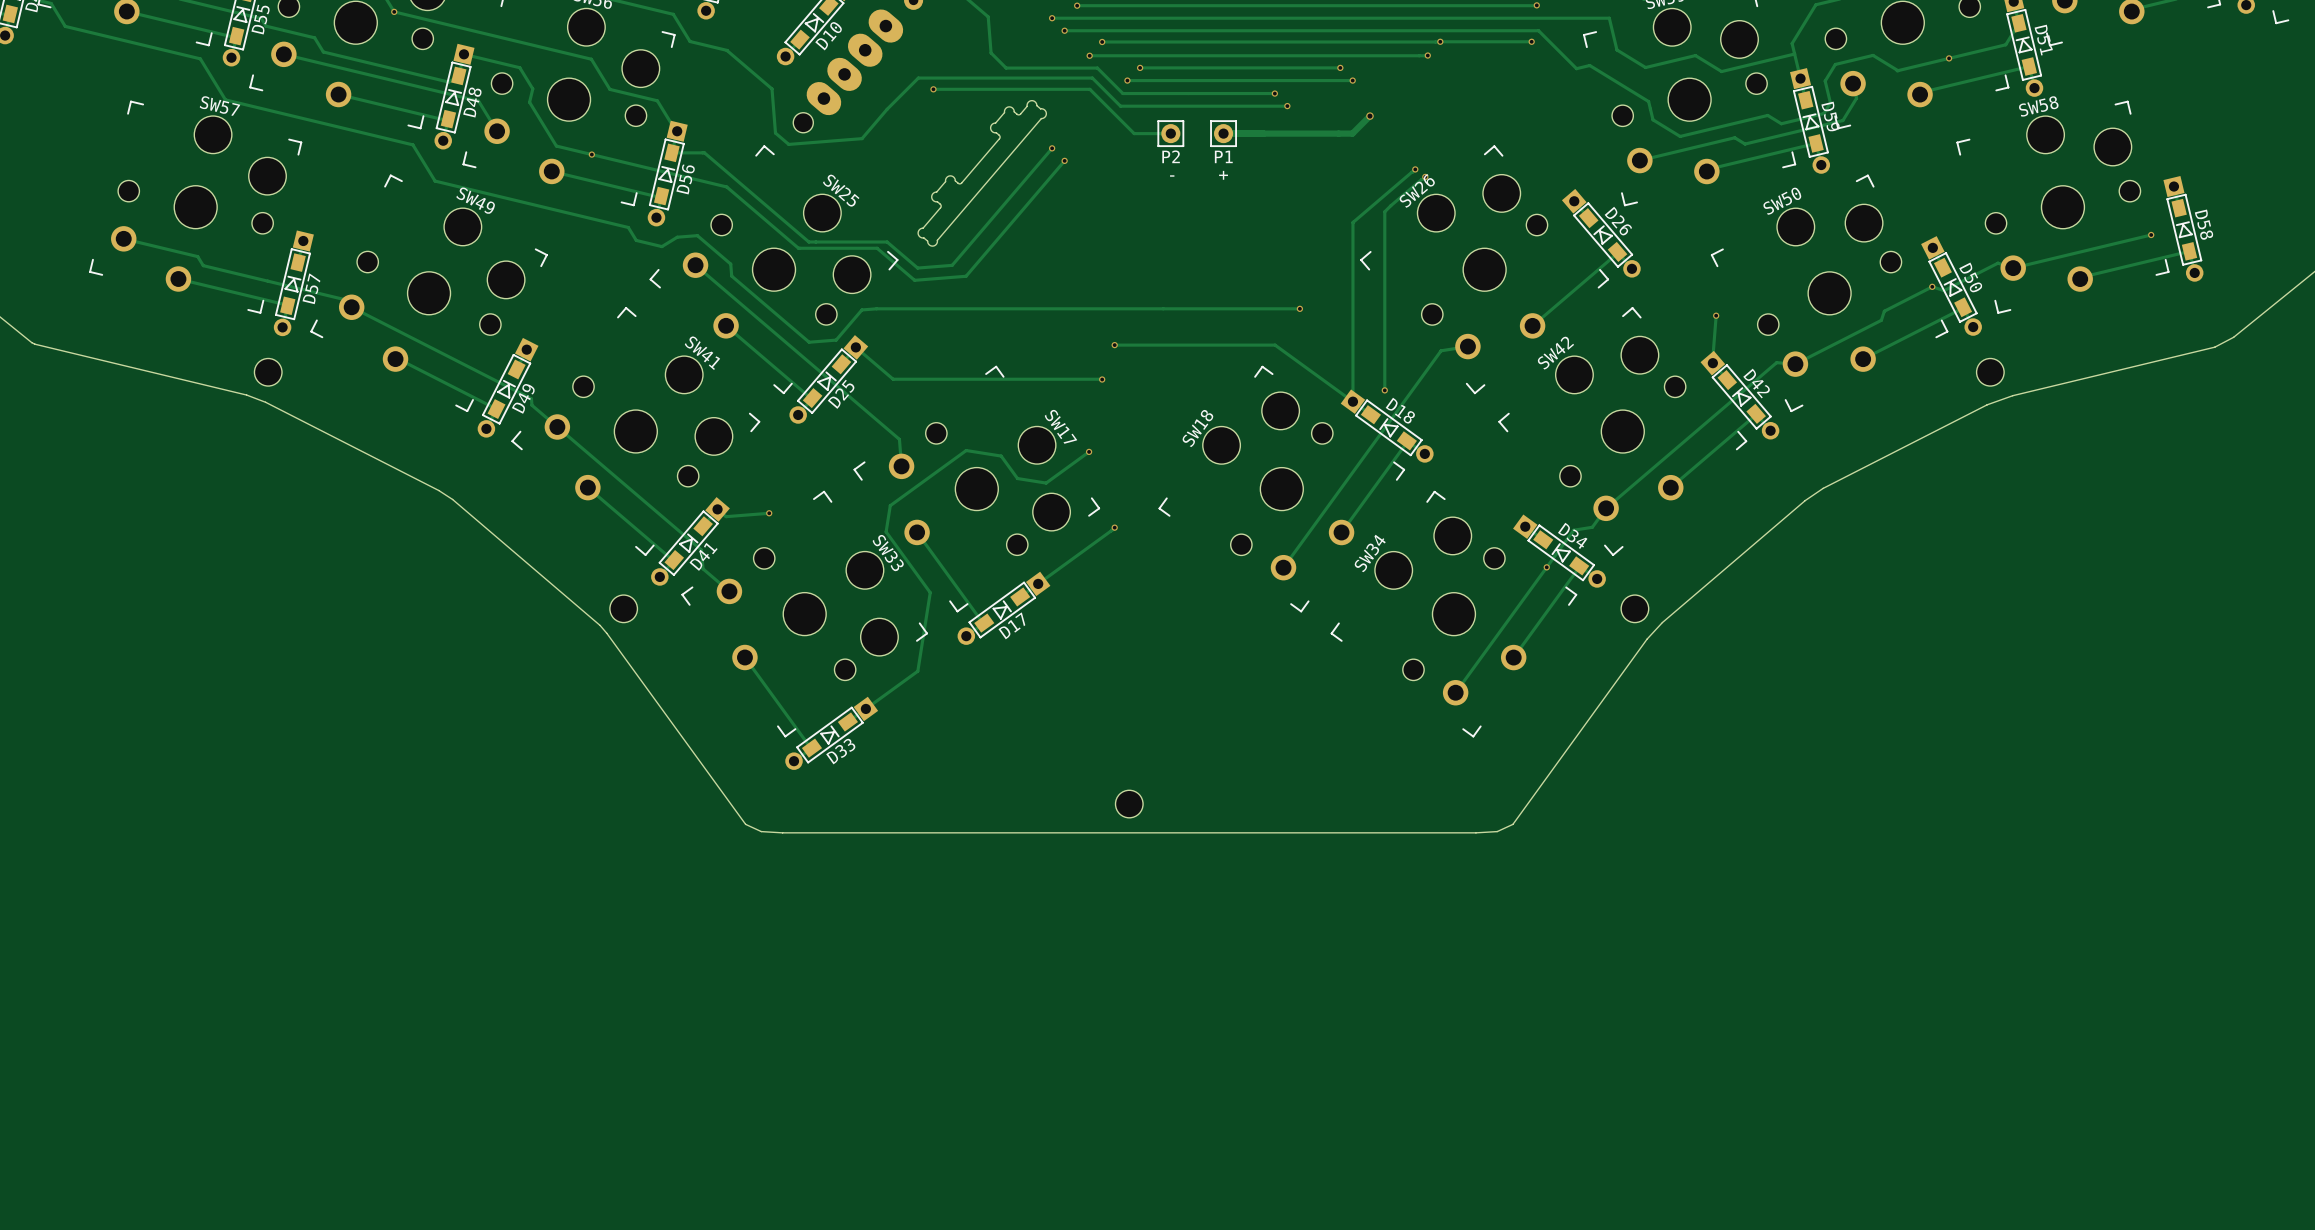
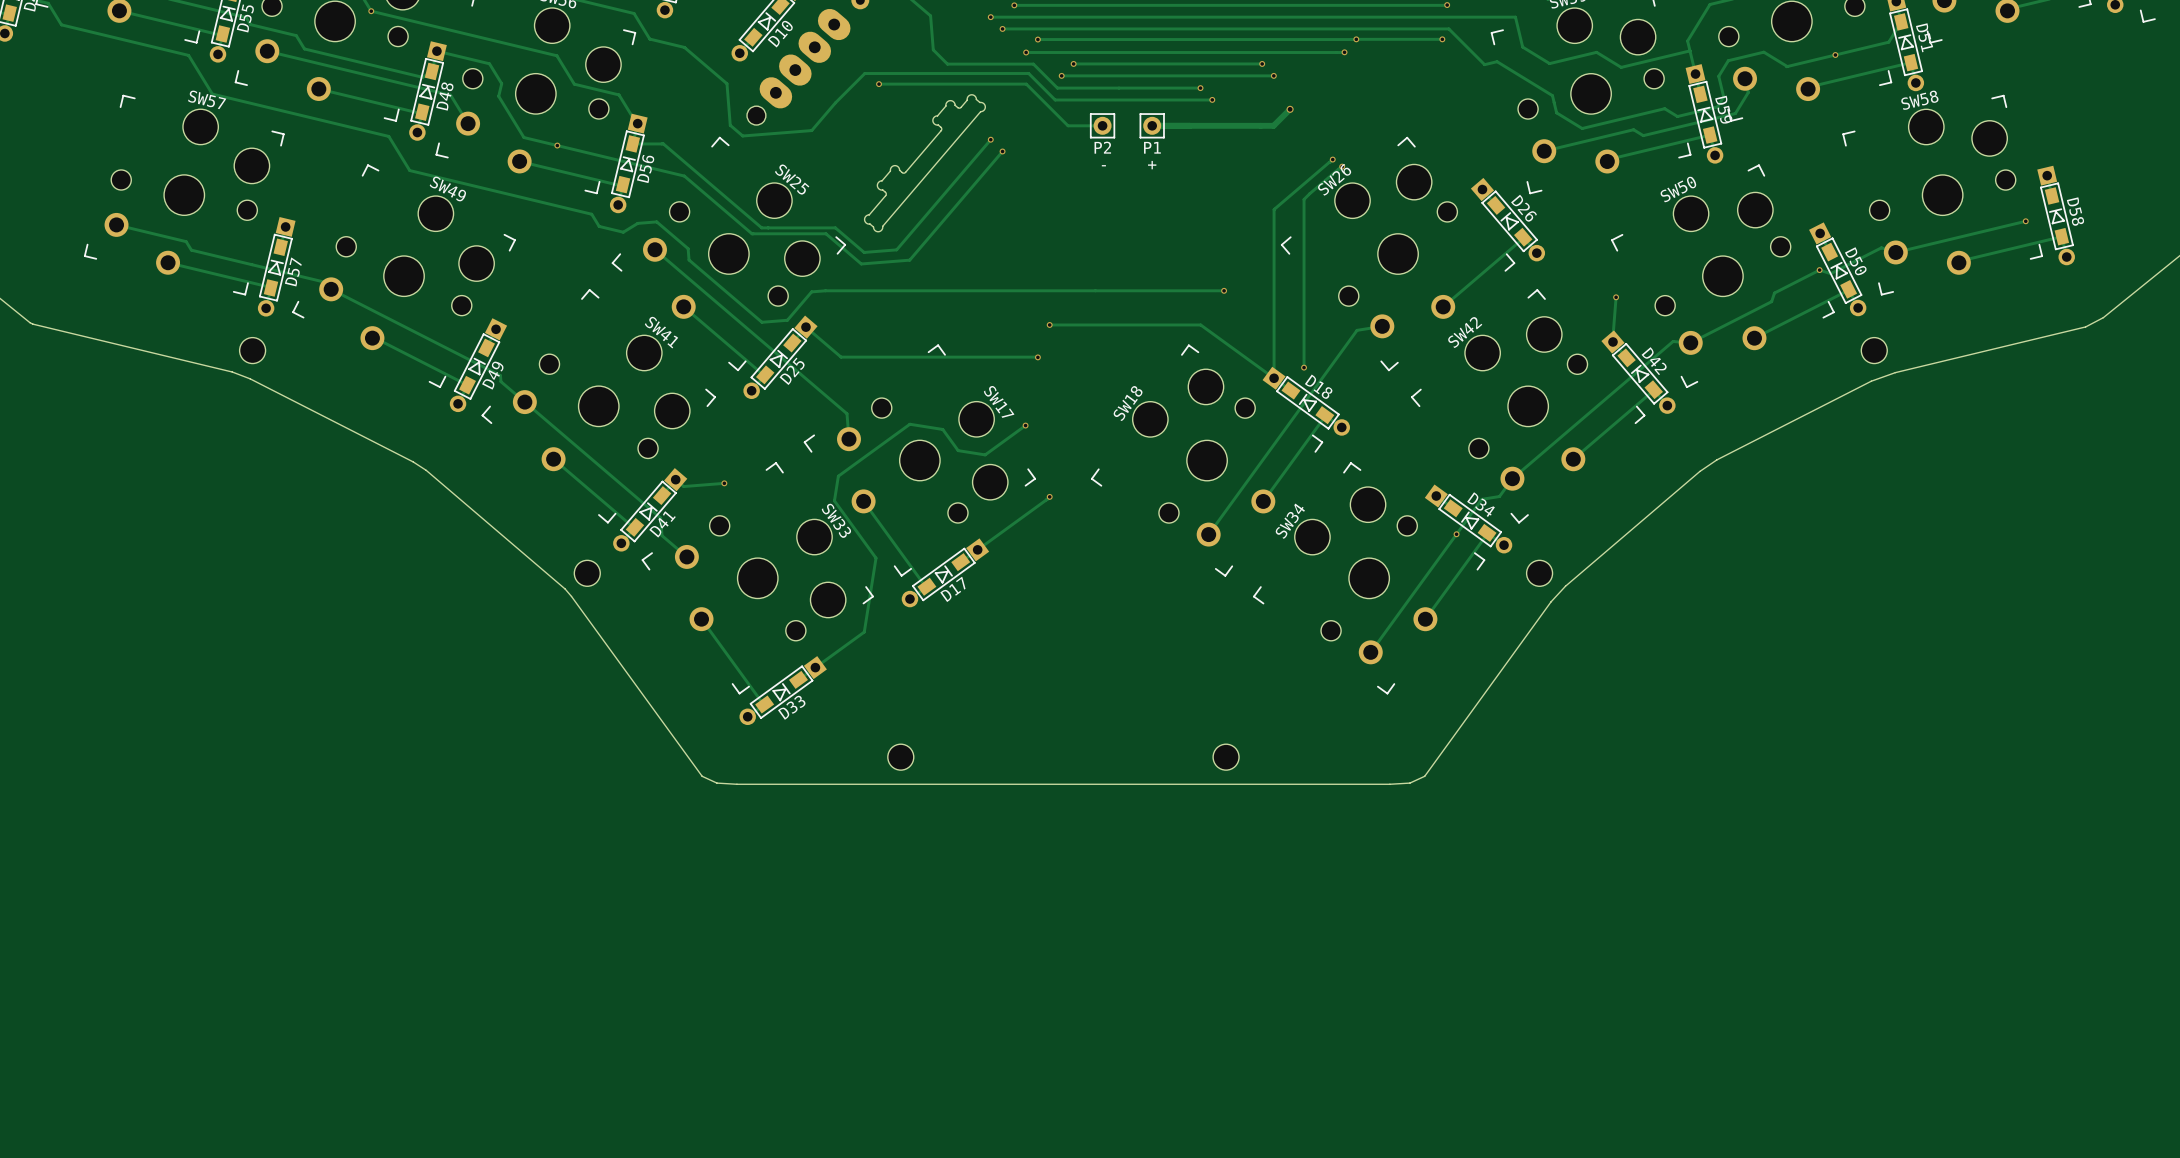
part: none -> (900, 757)
part: (1129, 804) -> none
part: none -> (1226, 757)

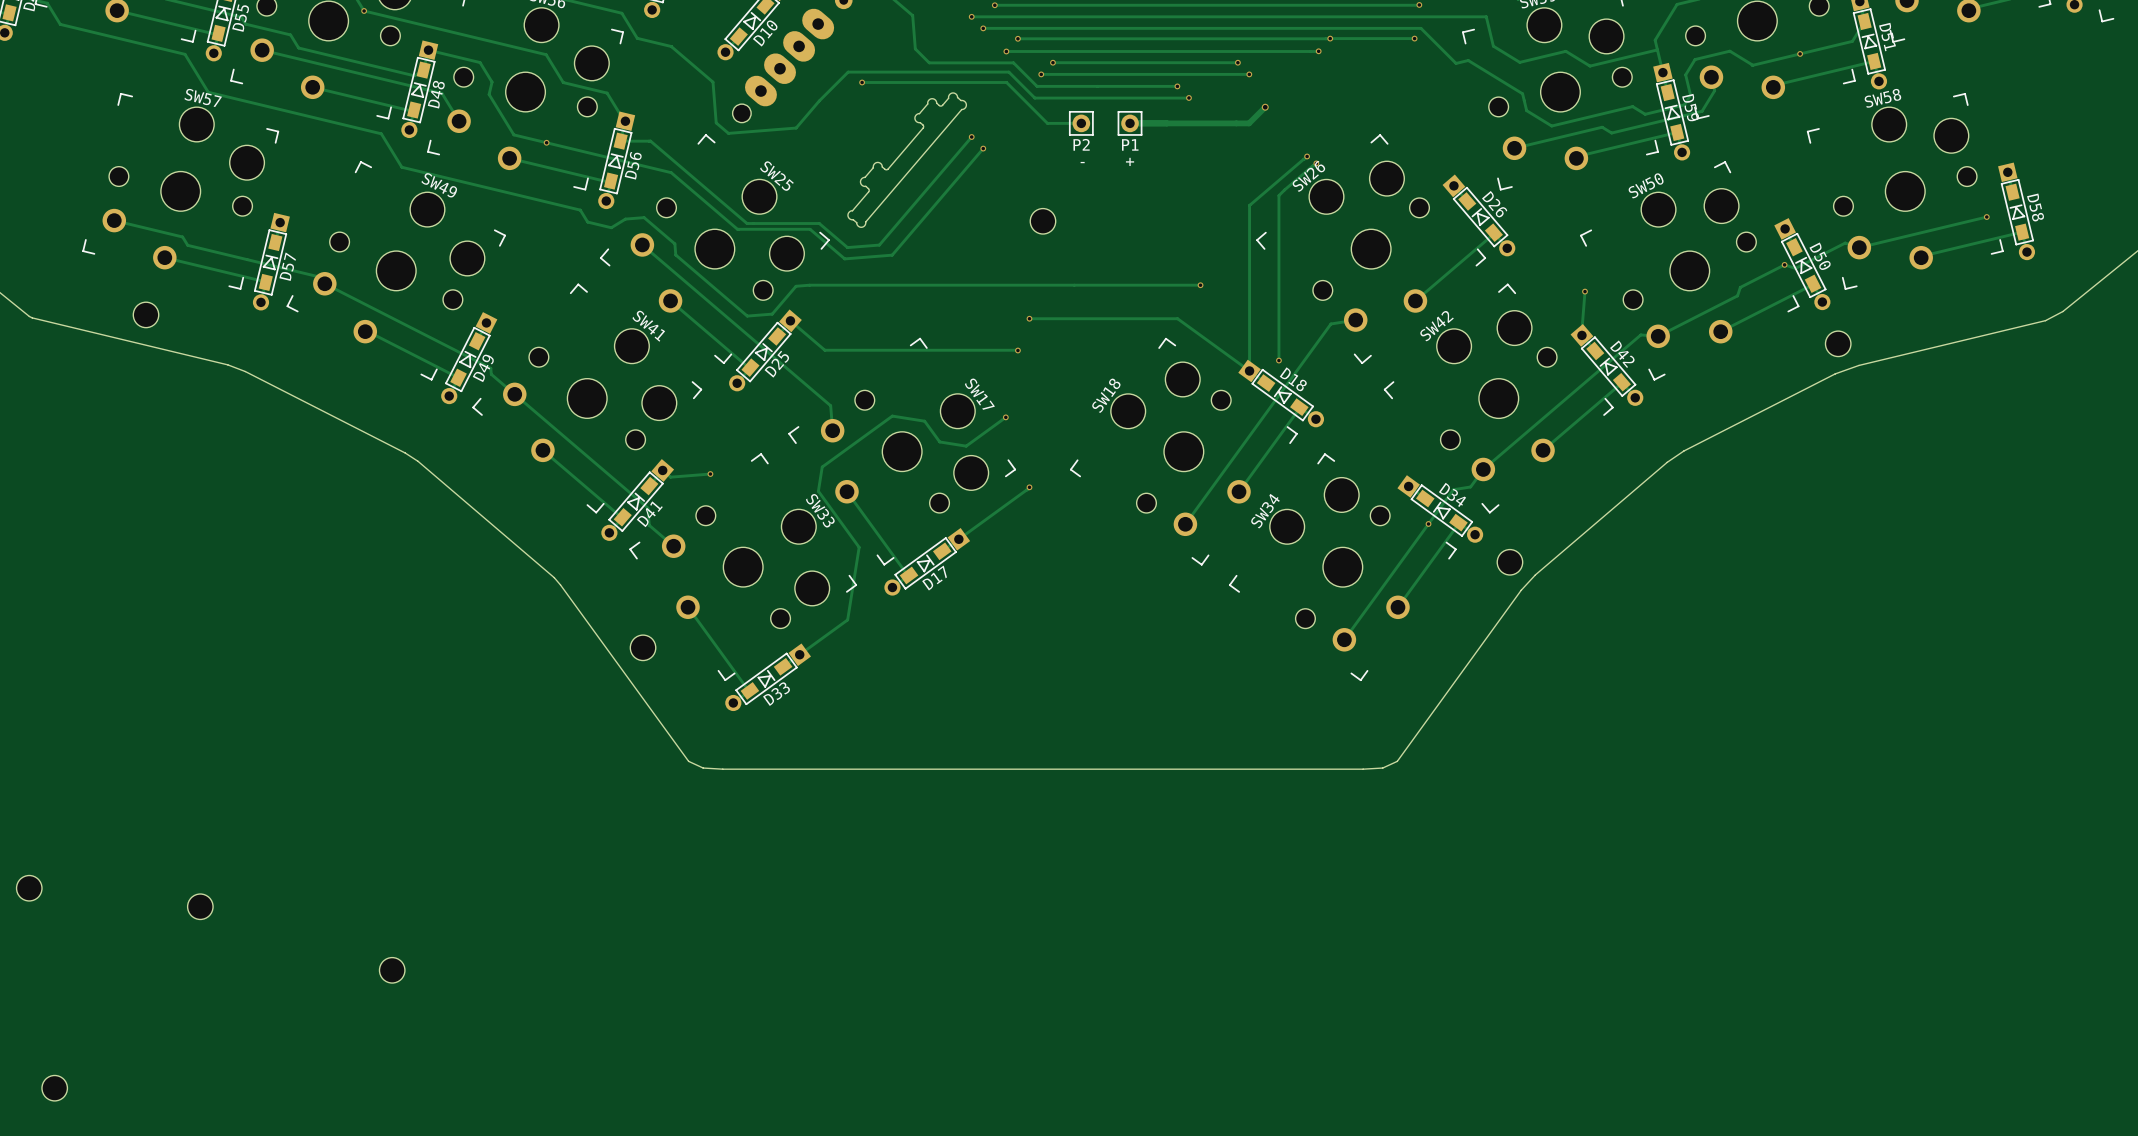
part: none -> (1042, 221)
part position: (252, 350) -> (146, 314)
part position: (587, 573) -> (643, 647)
part: (900, 757) -> none
part: (1226, 757) -> none
part: none -> (29, 888)
part: none -> (200, 906)
part: none -> (392, 970)
part: none -> (54, 1088)

